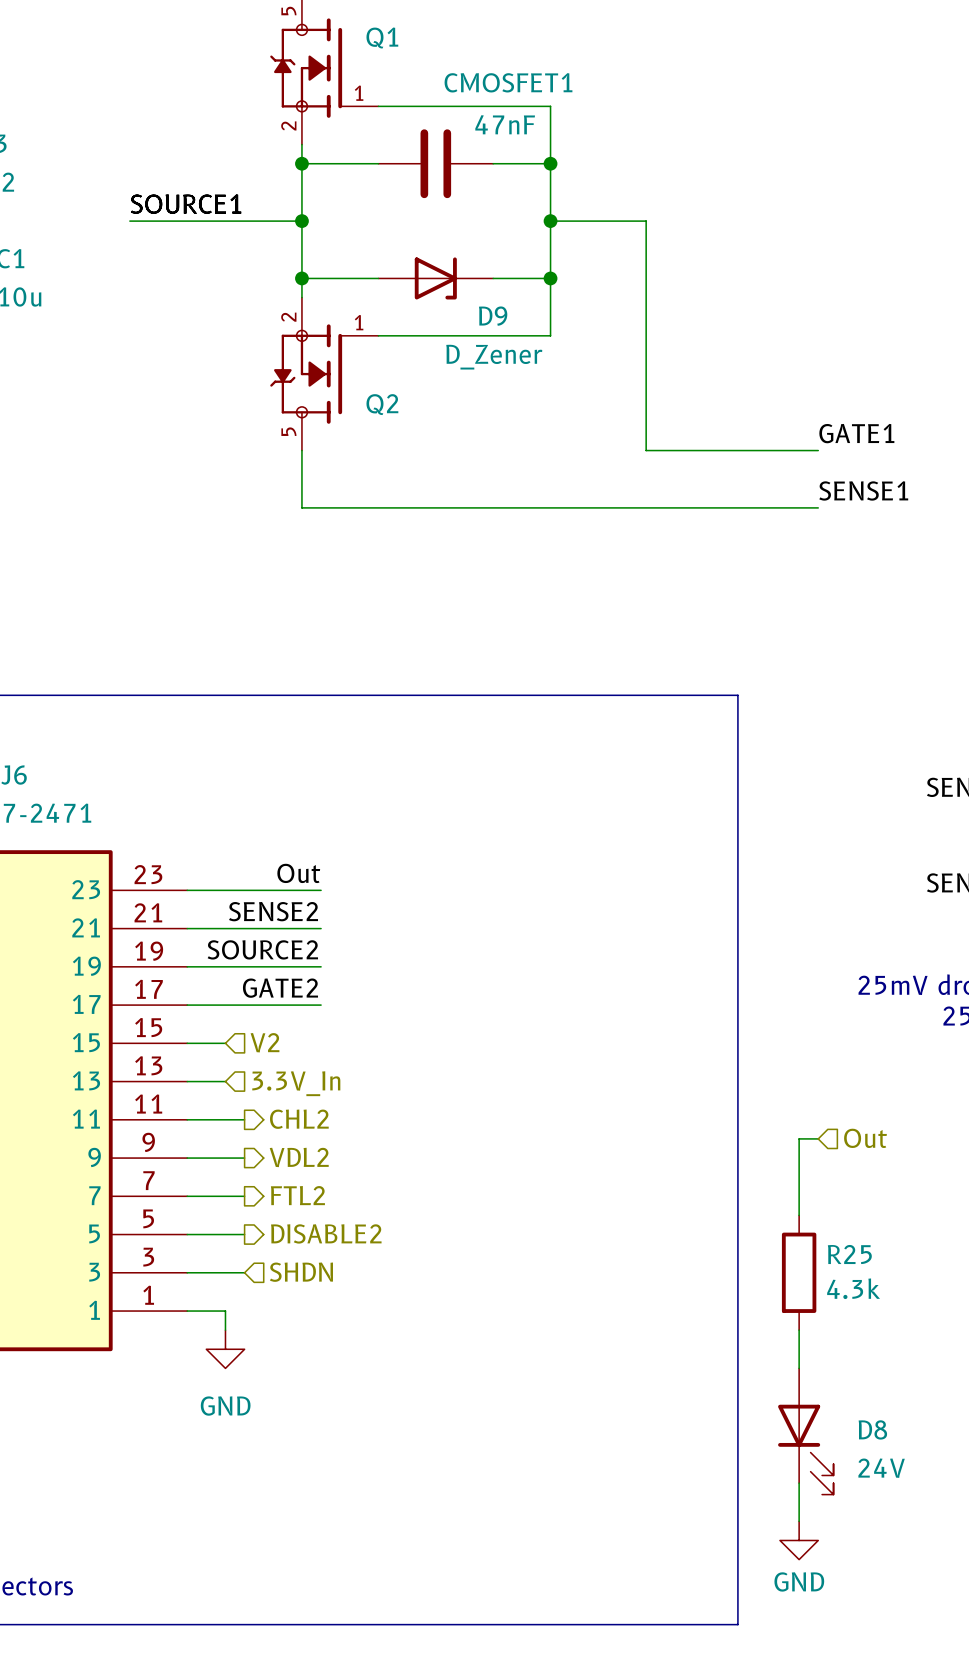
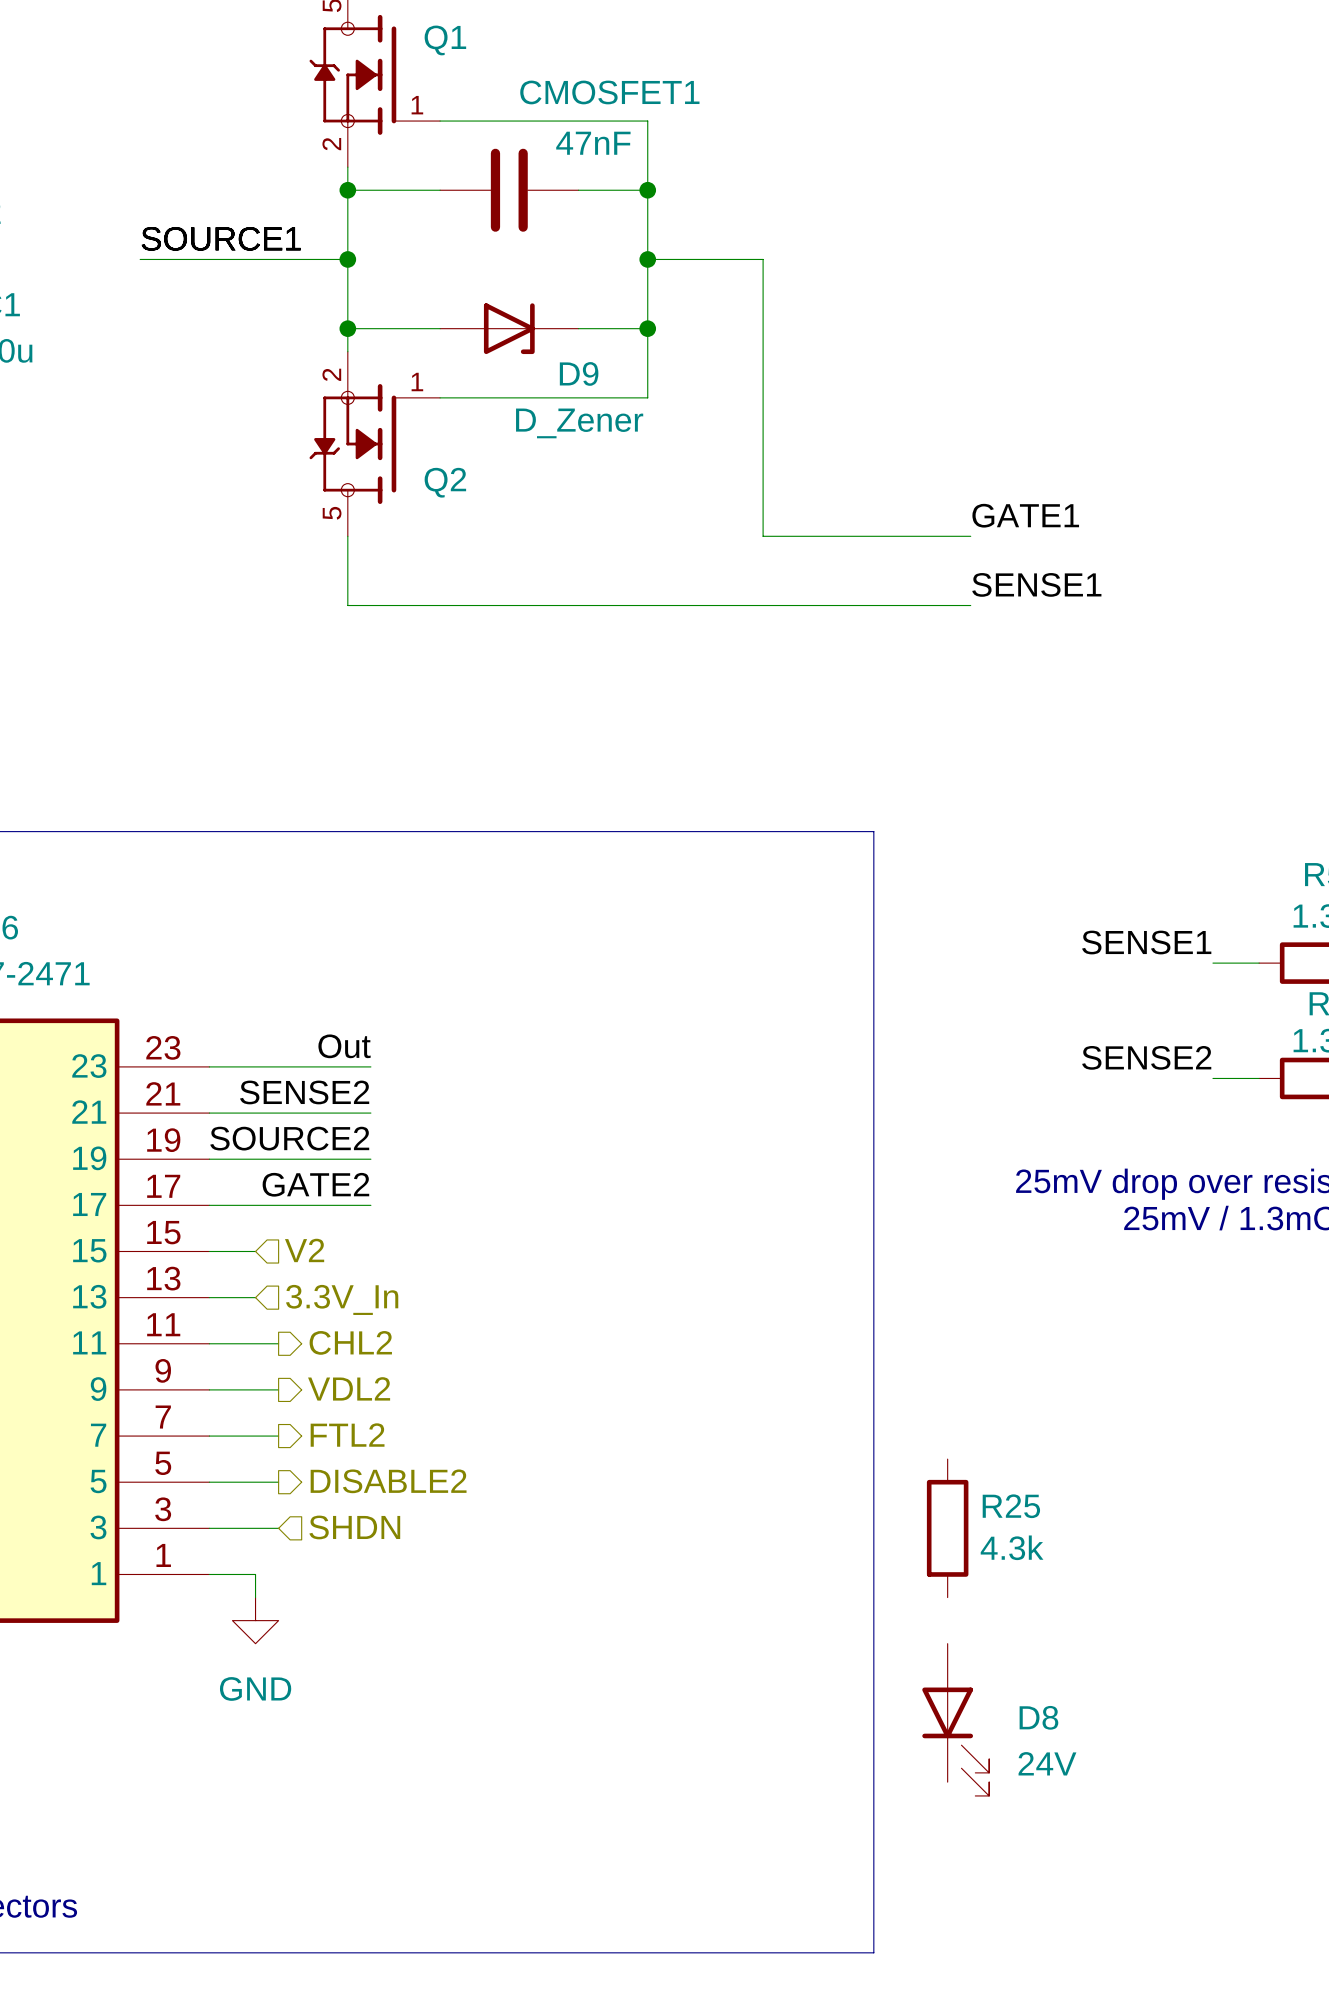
wire: (818, 1138) (799, 1138) (799, 1215) -> none
hierarchical label: Out (865, 1138) -> none
wire: (799, 1330) (799, 1368) -> none
wire: (799, 1483) (799, 1521) -> none
power symbol: GND (799, 1540) -> none

